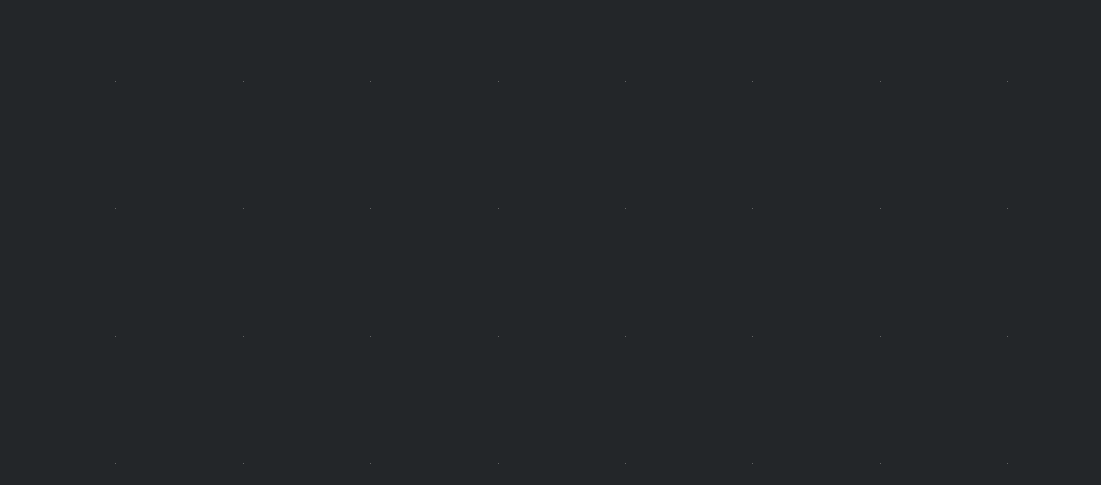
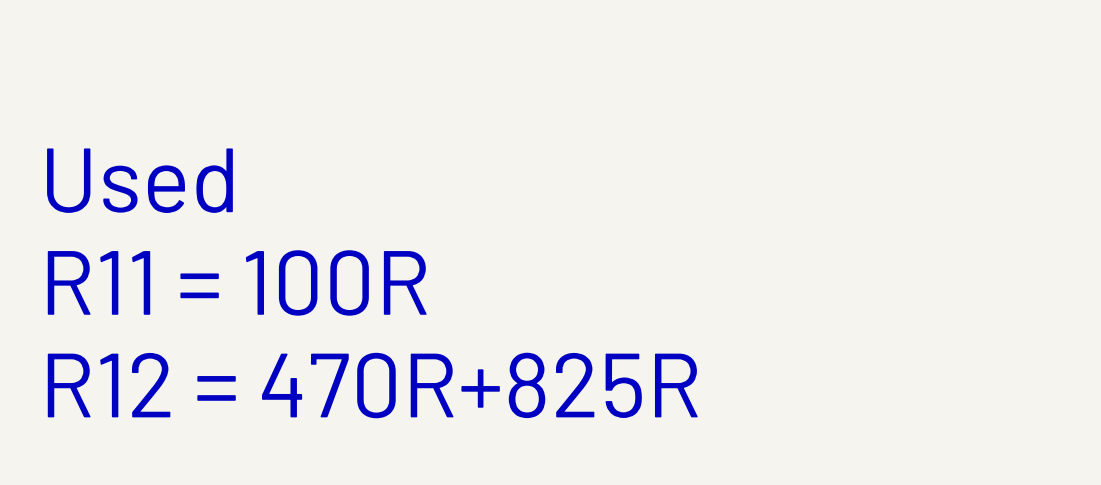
text: none -> Used (139, 180)
text: none -> R11 = 100R (237, 282)
text: none -> R12 = 470R+825R (372, 385)

